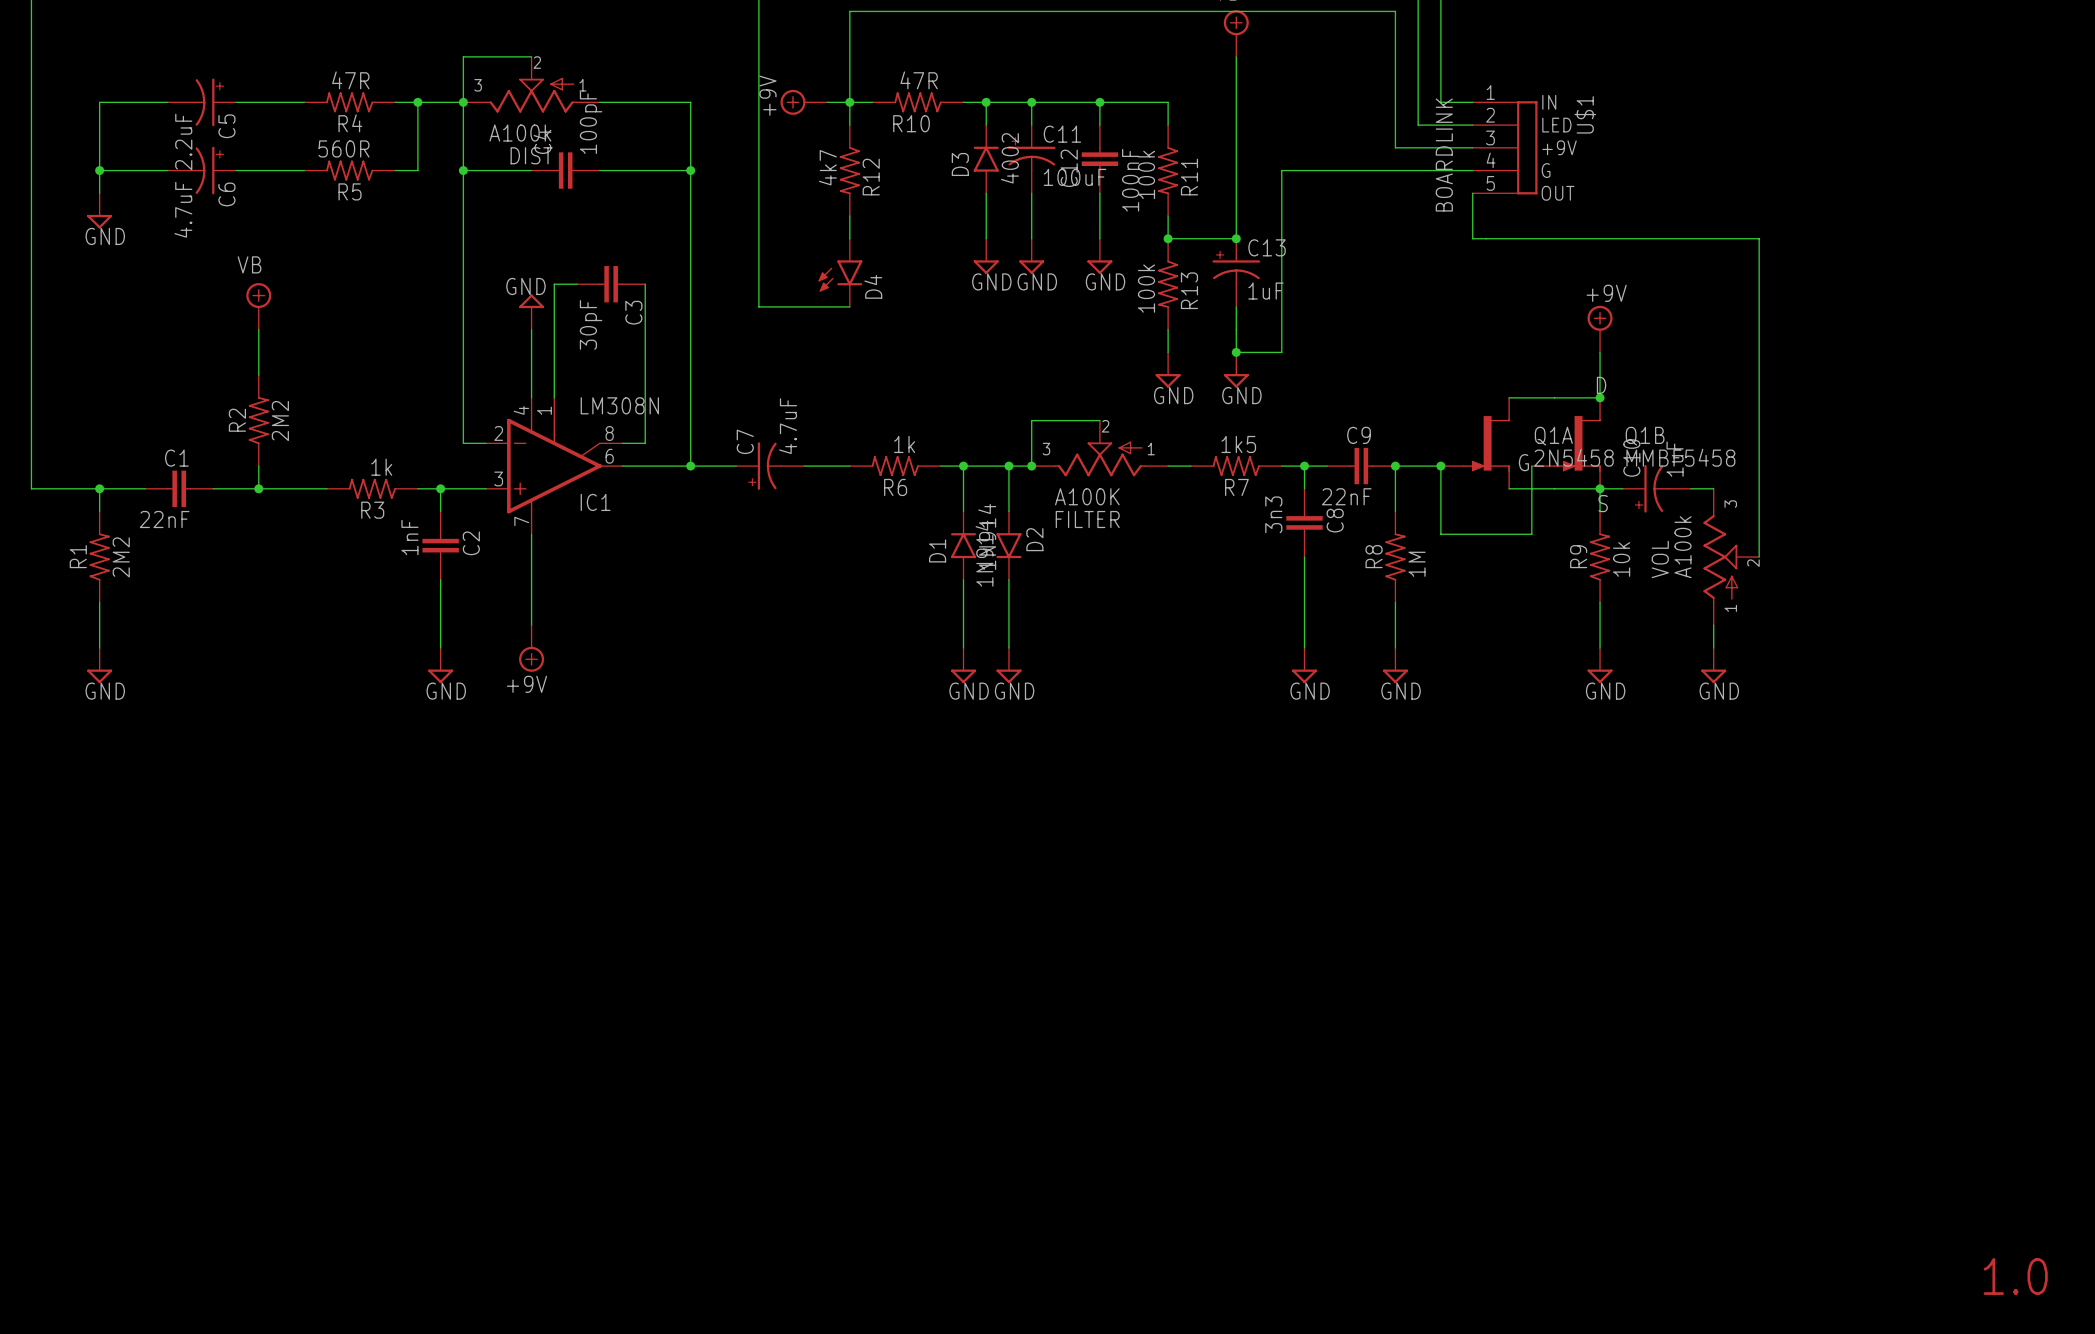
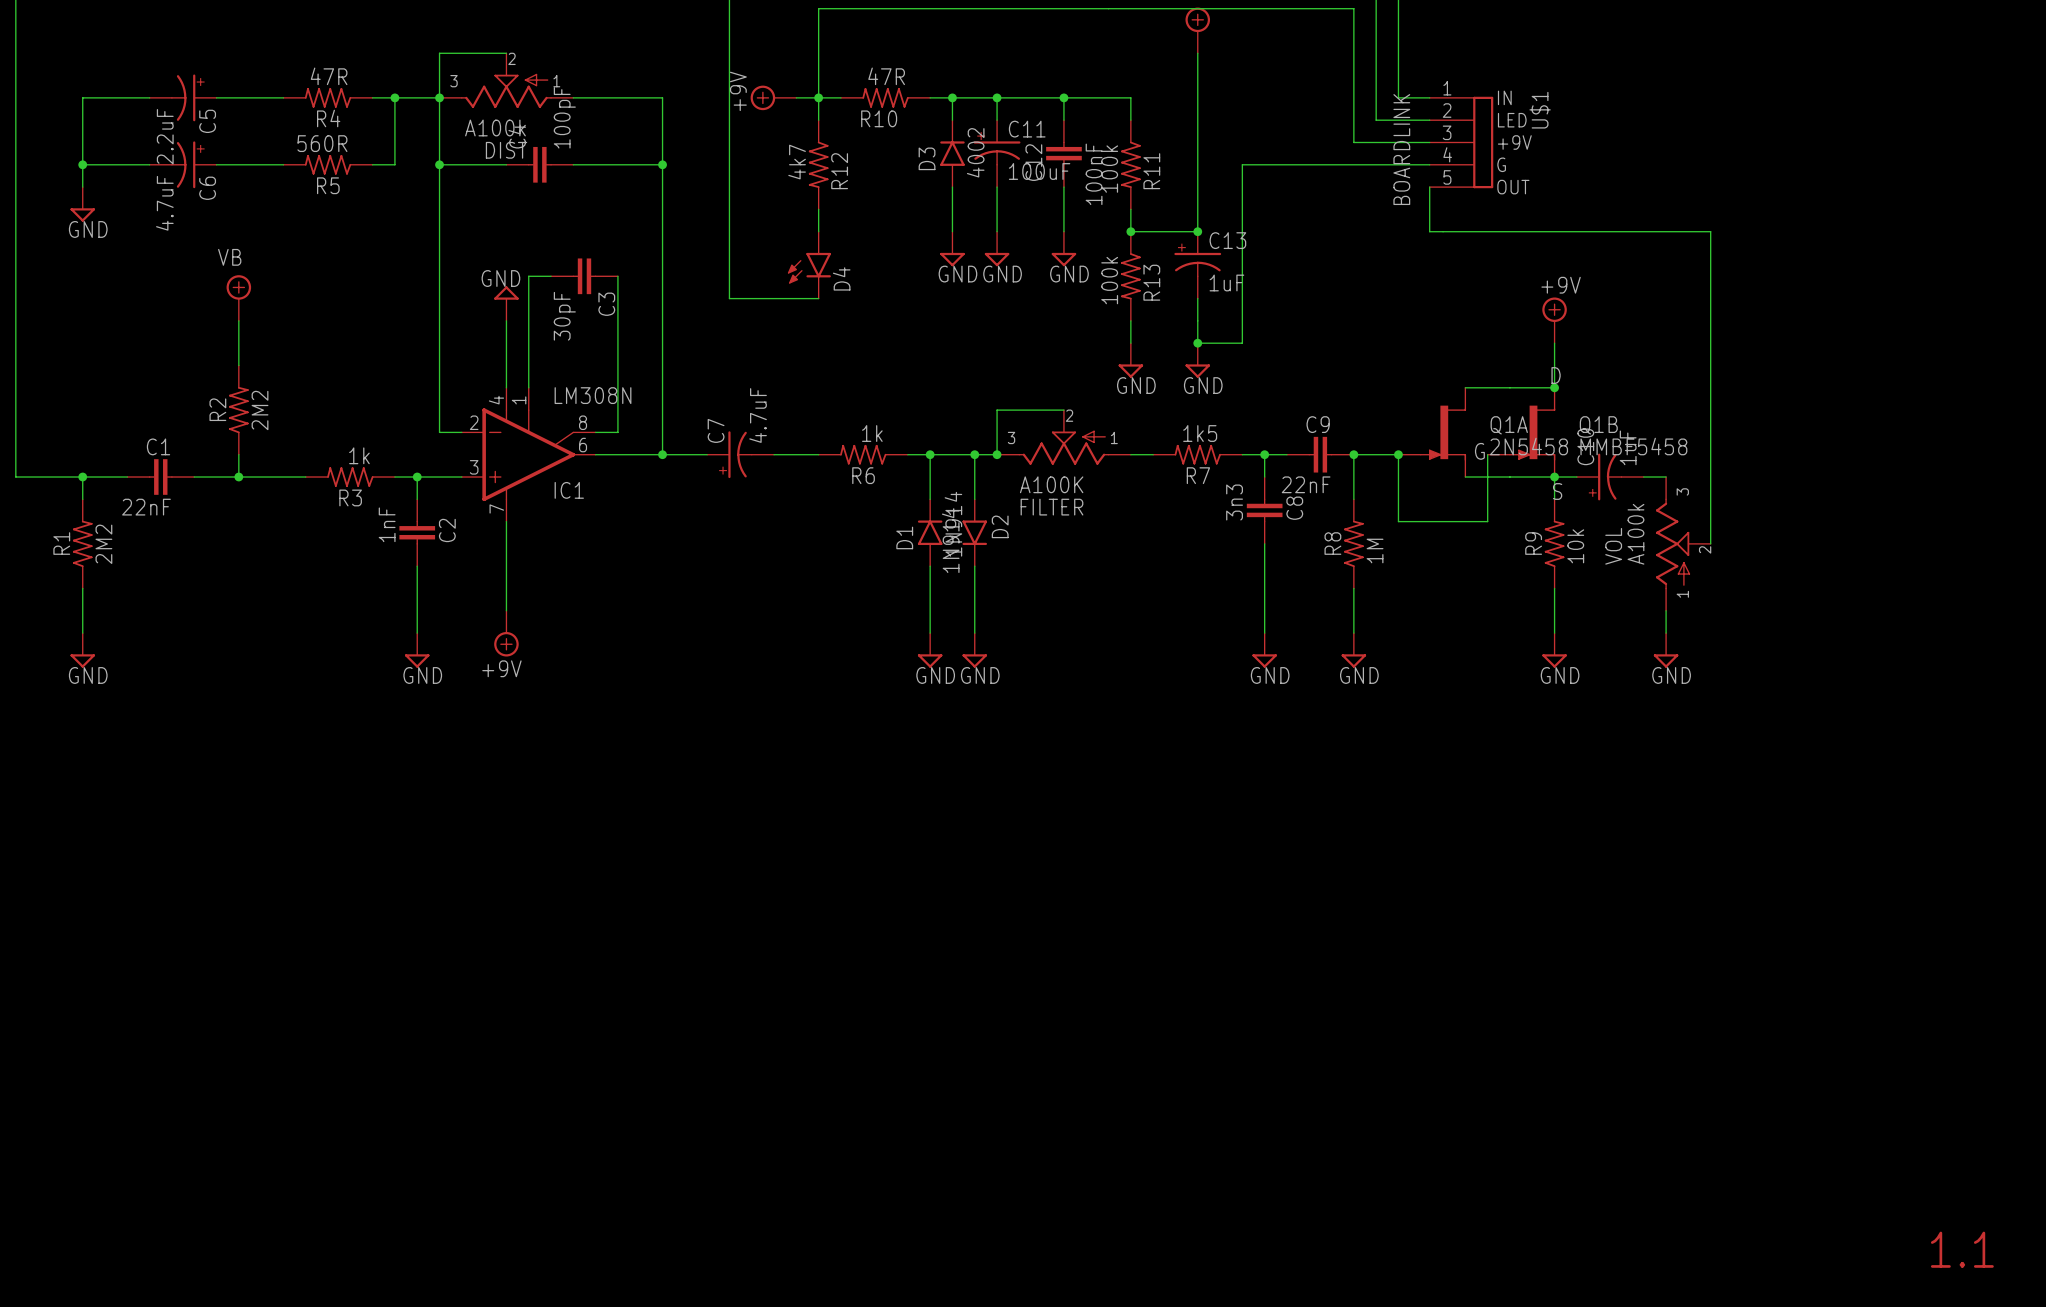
text: 1.0 (2015, 1276) -> 1.1 (1962, 1249)

